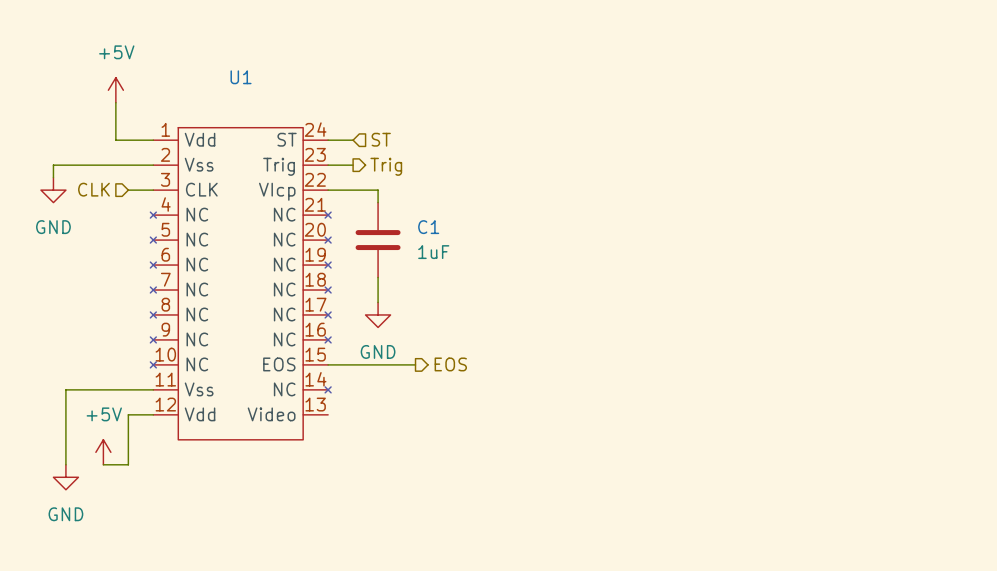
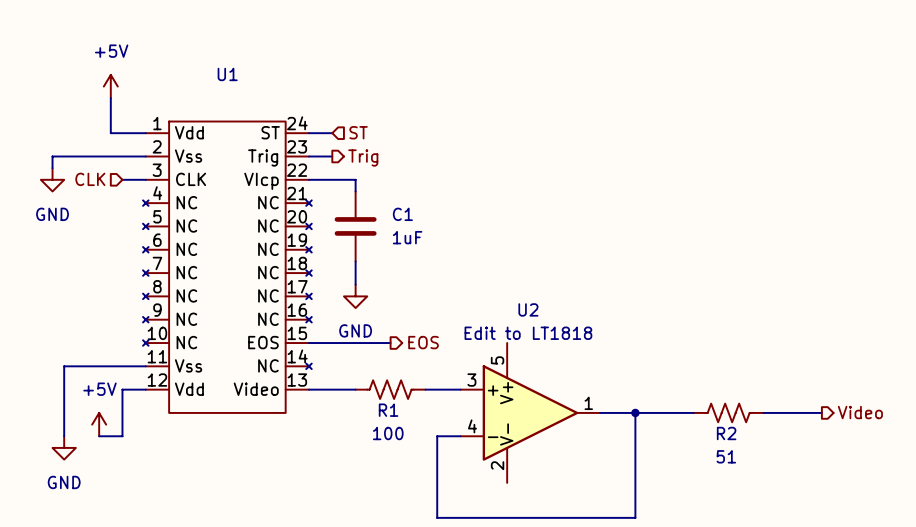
wire: none -> (308, 389) (355, 389)
R1: none -> 100 (390, 389)
wire: none -> (425, 389) (460, 389)
U2: none -> Edit to LT1818 (530, 412)
wire: none -> (600, 412) (693, 412)
wire: none -> (635, 412) (635, 517) (437, 517) (437, 436) (460, 436)
junction: none -> (635, 412)
R2: none -> 51 (728, 412)
wire: none -> (763, 412) (821, 412)
hierarchical label: none -> Video (860, 412)

